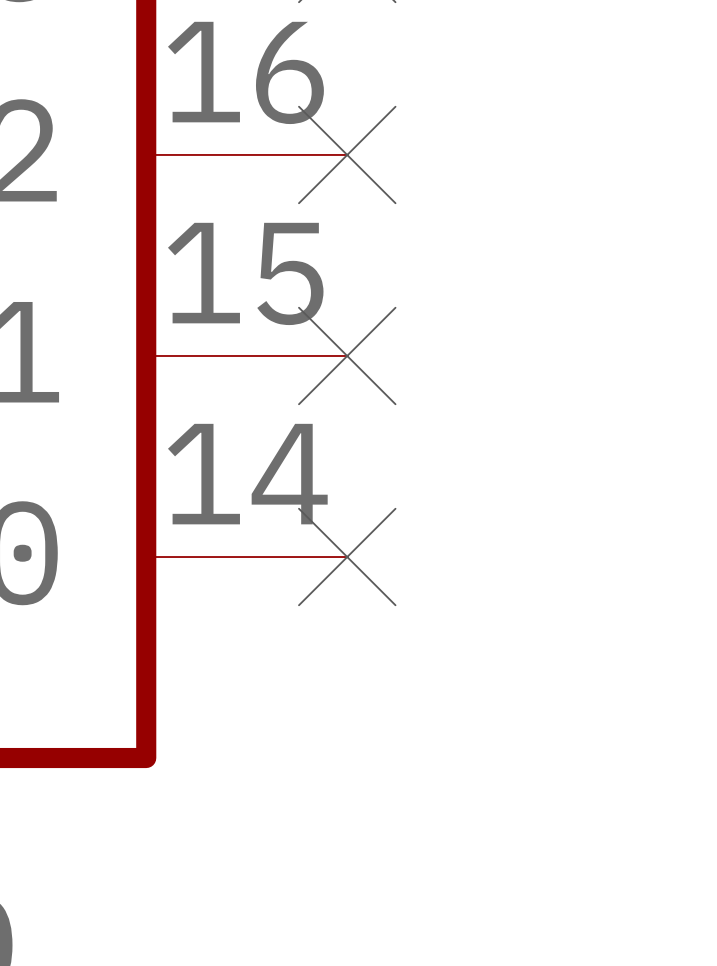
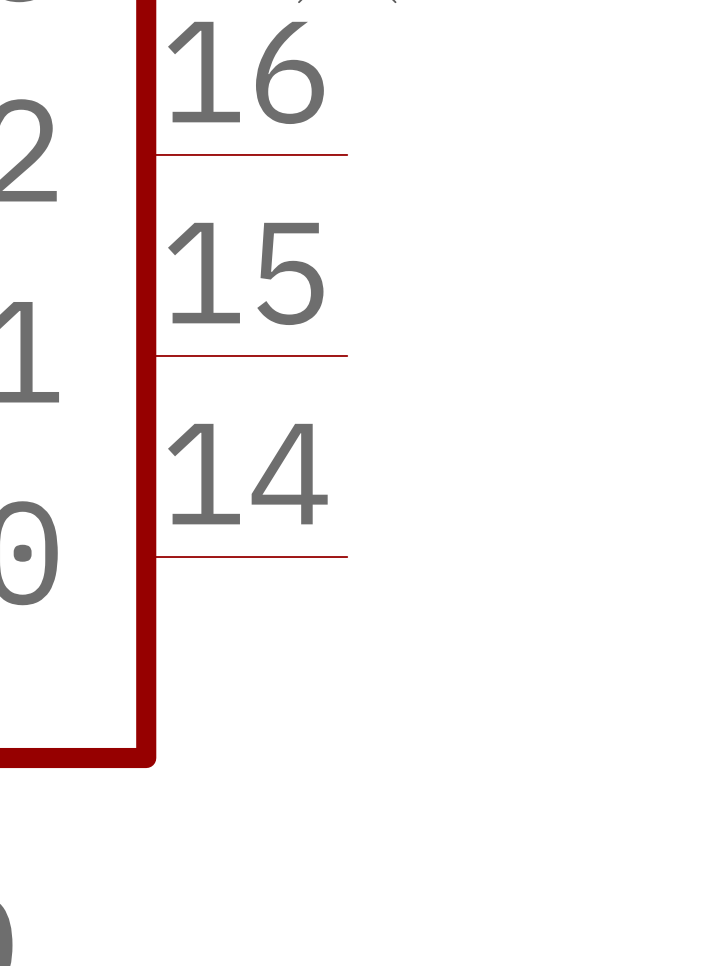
no-connect mark: (347, 154) -> none
no-connect mark: (347, 355) -> none
no-connect mark: (347, 557) -> none

